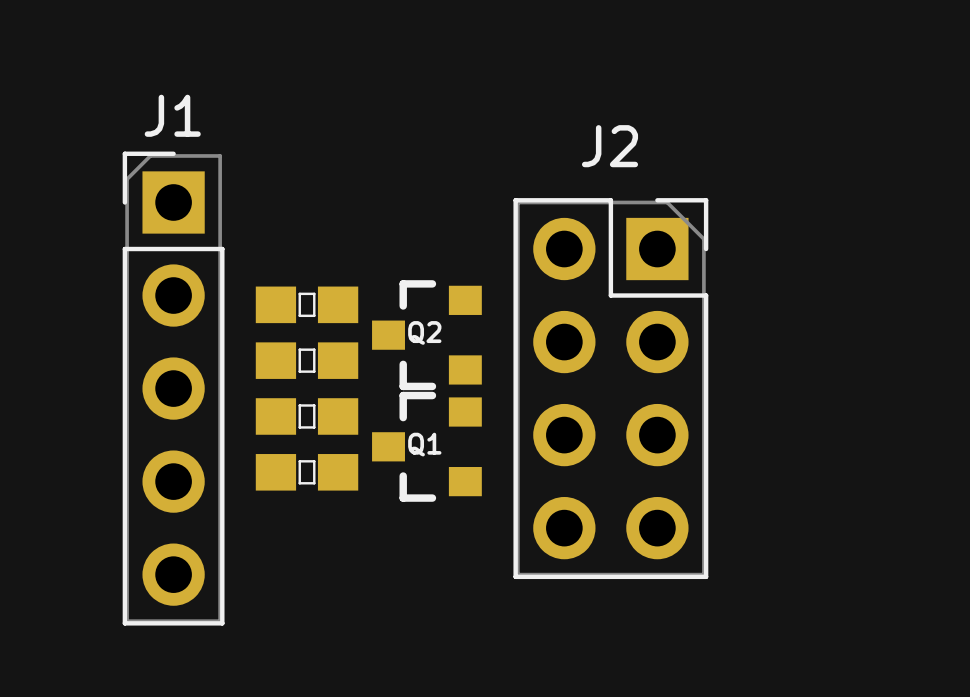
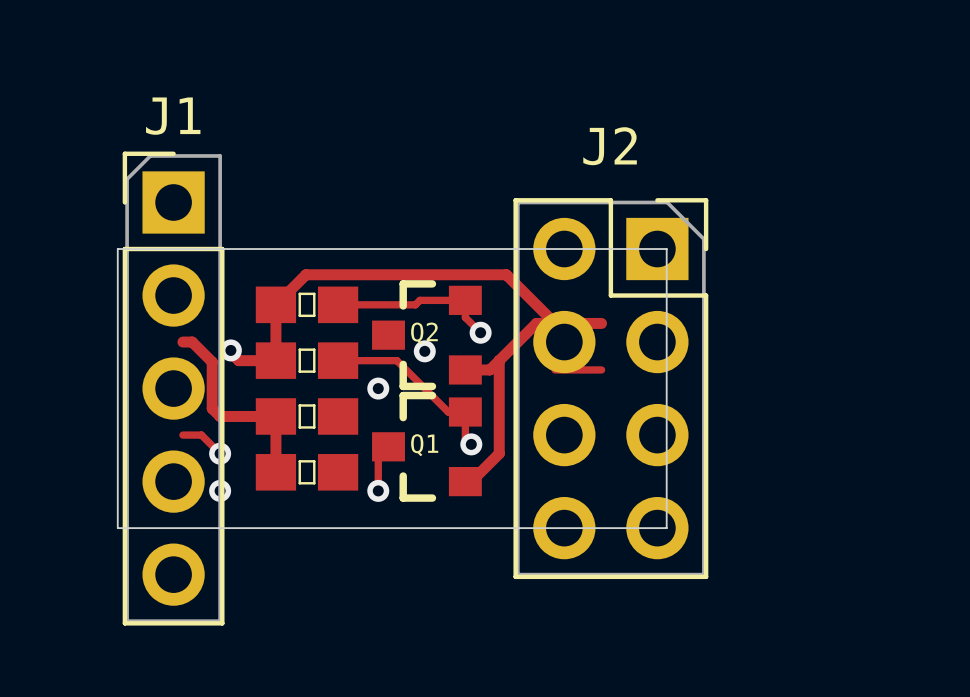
board edge: none -> (117, 249) (117, 528) (666, 528) (666, 249) (117, 249)
track: none -> (338, 304) (415, 304) (419, 300) (465, 300) (465, 317) (480, 332)
track: none -> (555, 323) (506, 274) (306, 274) (275, 304) (275, 360) (238, 360) (230, 350)
track: none -> (601, 323) (536, 323) (489, 369) (465, 369)
via: none -> (480, 332)
track: none -> (182, 342) (192, 342) (212, 362) (212, 408) (220, 416) (275, 416) (275, 472)
via: none -> (230, 350)
via: none -> (424, 351)
track: none -> (338, 360) (396, 360) (448, 412) (465, 412) (465, 438) (471, 444)
track: none -> (499, 360) (499, 453) (471, 481) (465, 481)
track: none -> (555, 369) (601, 369)
via: none -> (378, 388)
track: none -> (182, 435) (201, 435) (220, 453)
via: none -> (471, 444)
via: none -> (220, 453)
track: none -> (378, 457) (378, 490)
via: none -> (220, 490)
via: none -> (378, 490)

